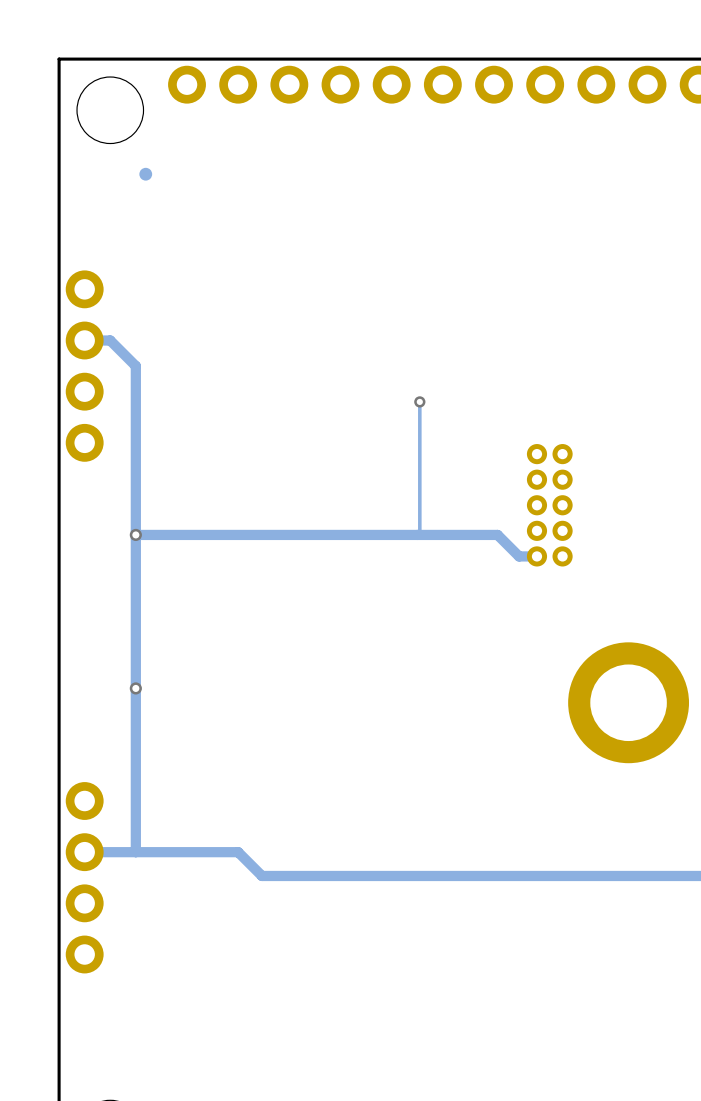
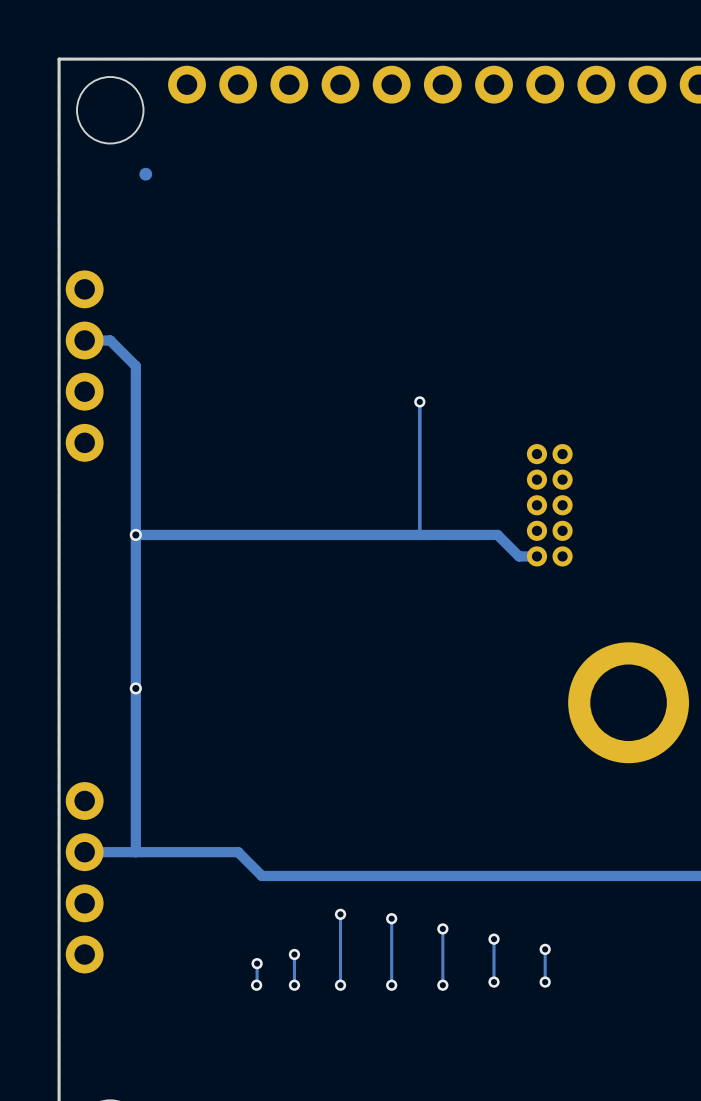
track: none -> (340, 914) (340, 985)
via: none -> (340, 914)
track: none -> (391, 918) (391, 985)
via: none -> (391, 918)
track: none -> (442, 928) (442, 985)
via: none -> (442, 928)
track: none -> (494, 939) (494, 982)
via: none -> (494, 939)
track: none -> (545, 949) (545, 982)
via: none -> (545, 949)
track: none -> (294, 954) (294, 985)
via: none -> (294, 954)
track: none -> (257, 963) (256, 985)
via: none -> (257, 963)
via: none -> (494, 982)
via: none -> (545, 982)
via: none -> (256, 985)
via: none -> (294, 985)
via: none -> (340, 985)
via: none -> (391, 985)
via: none -> (442, 985)

